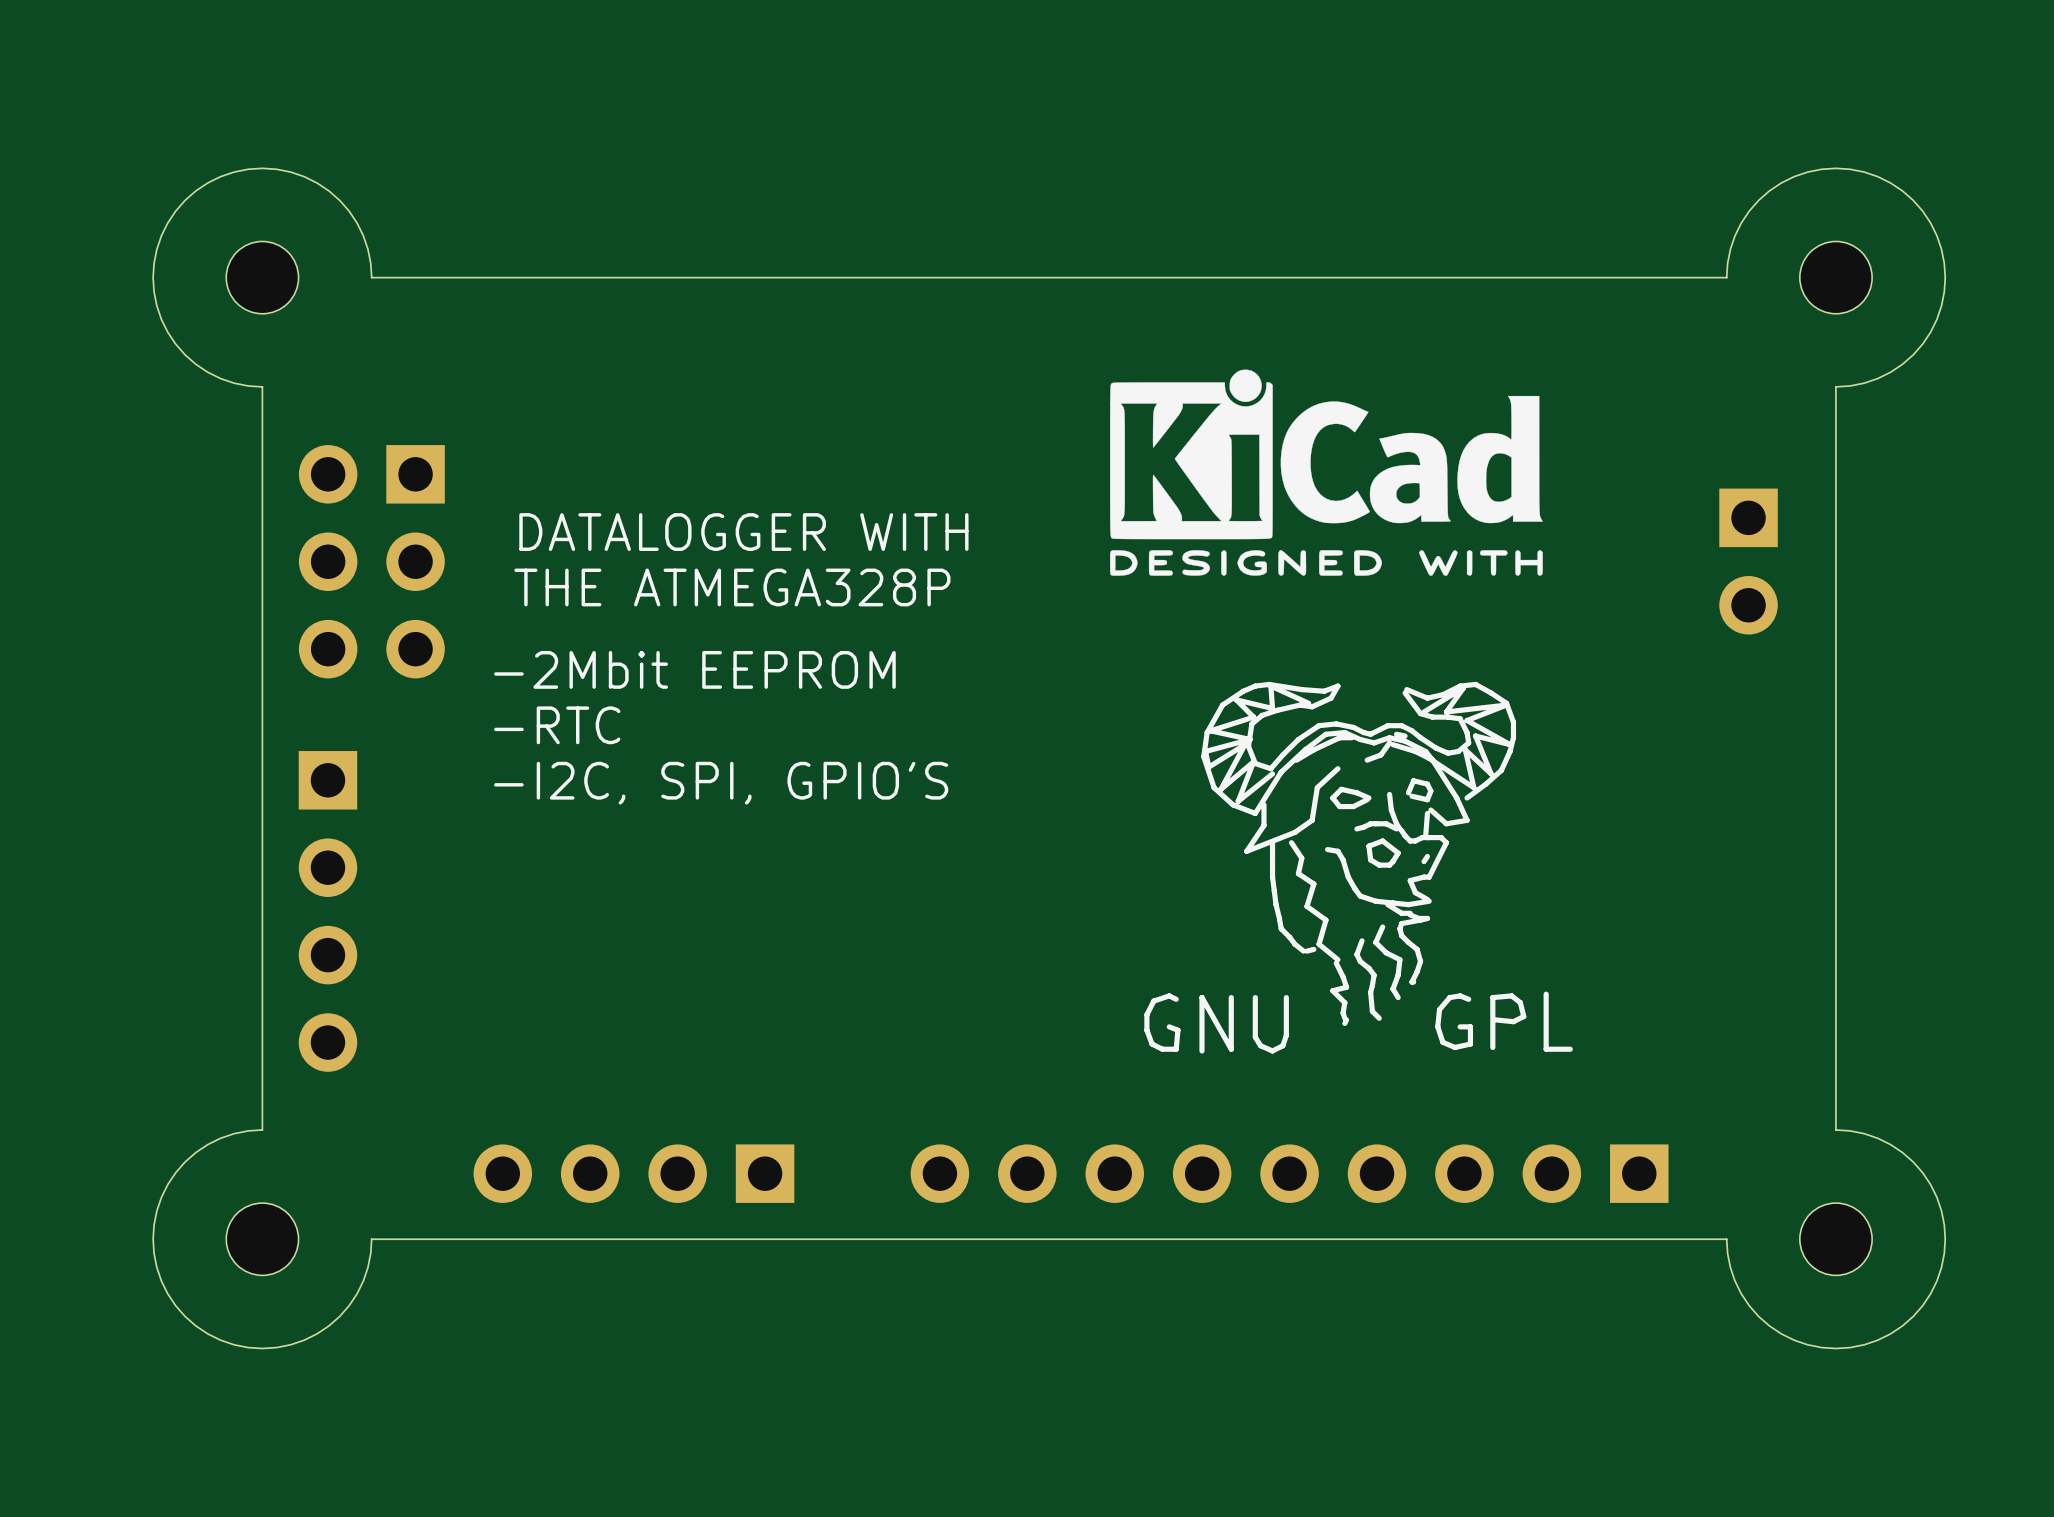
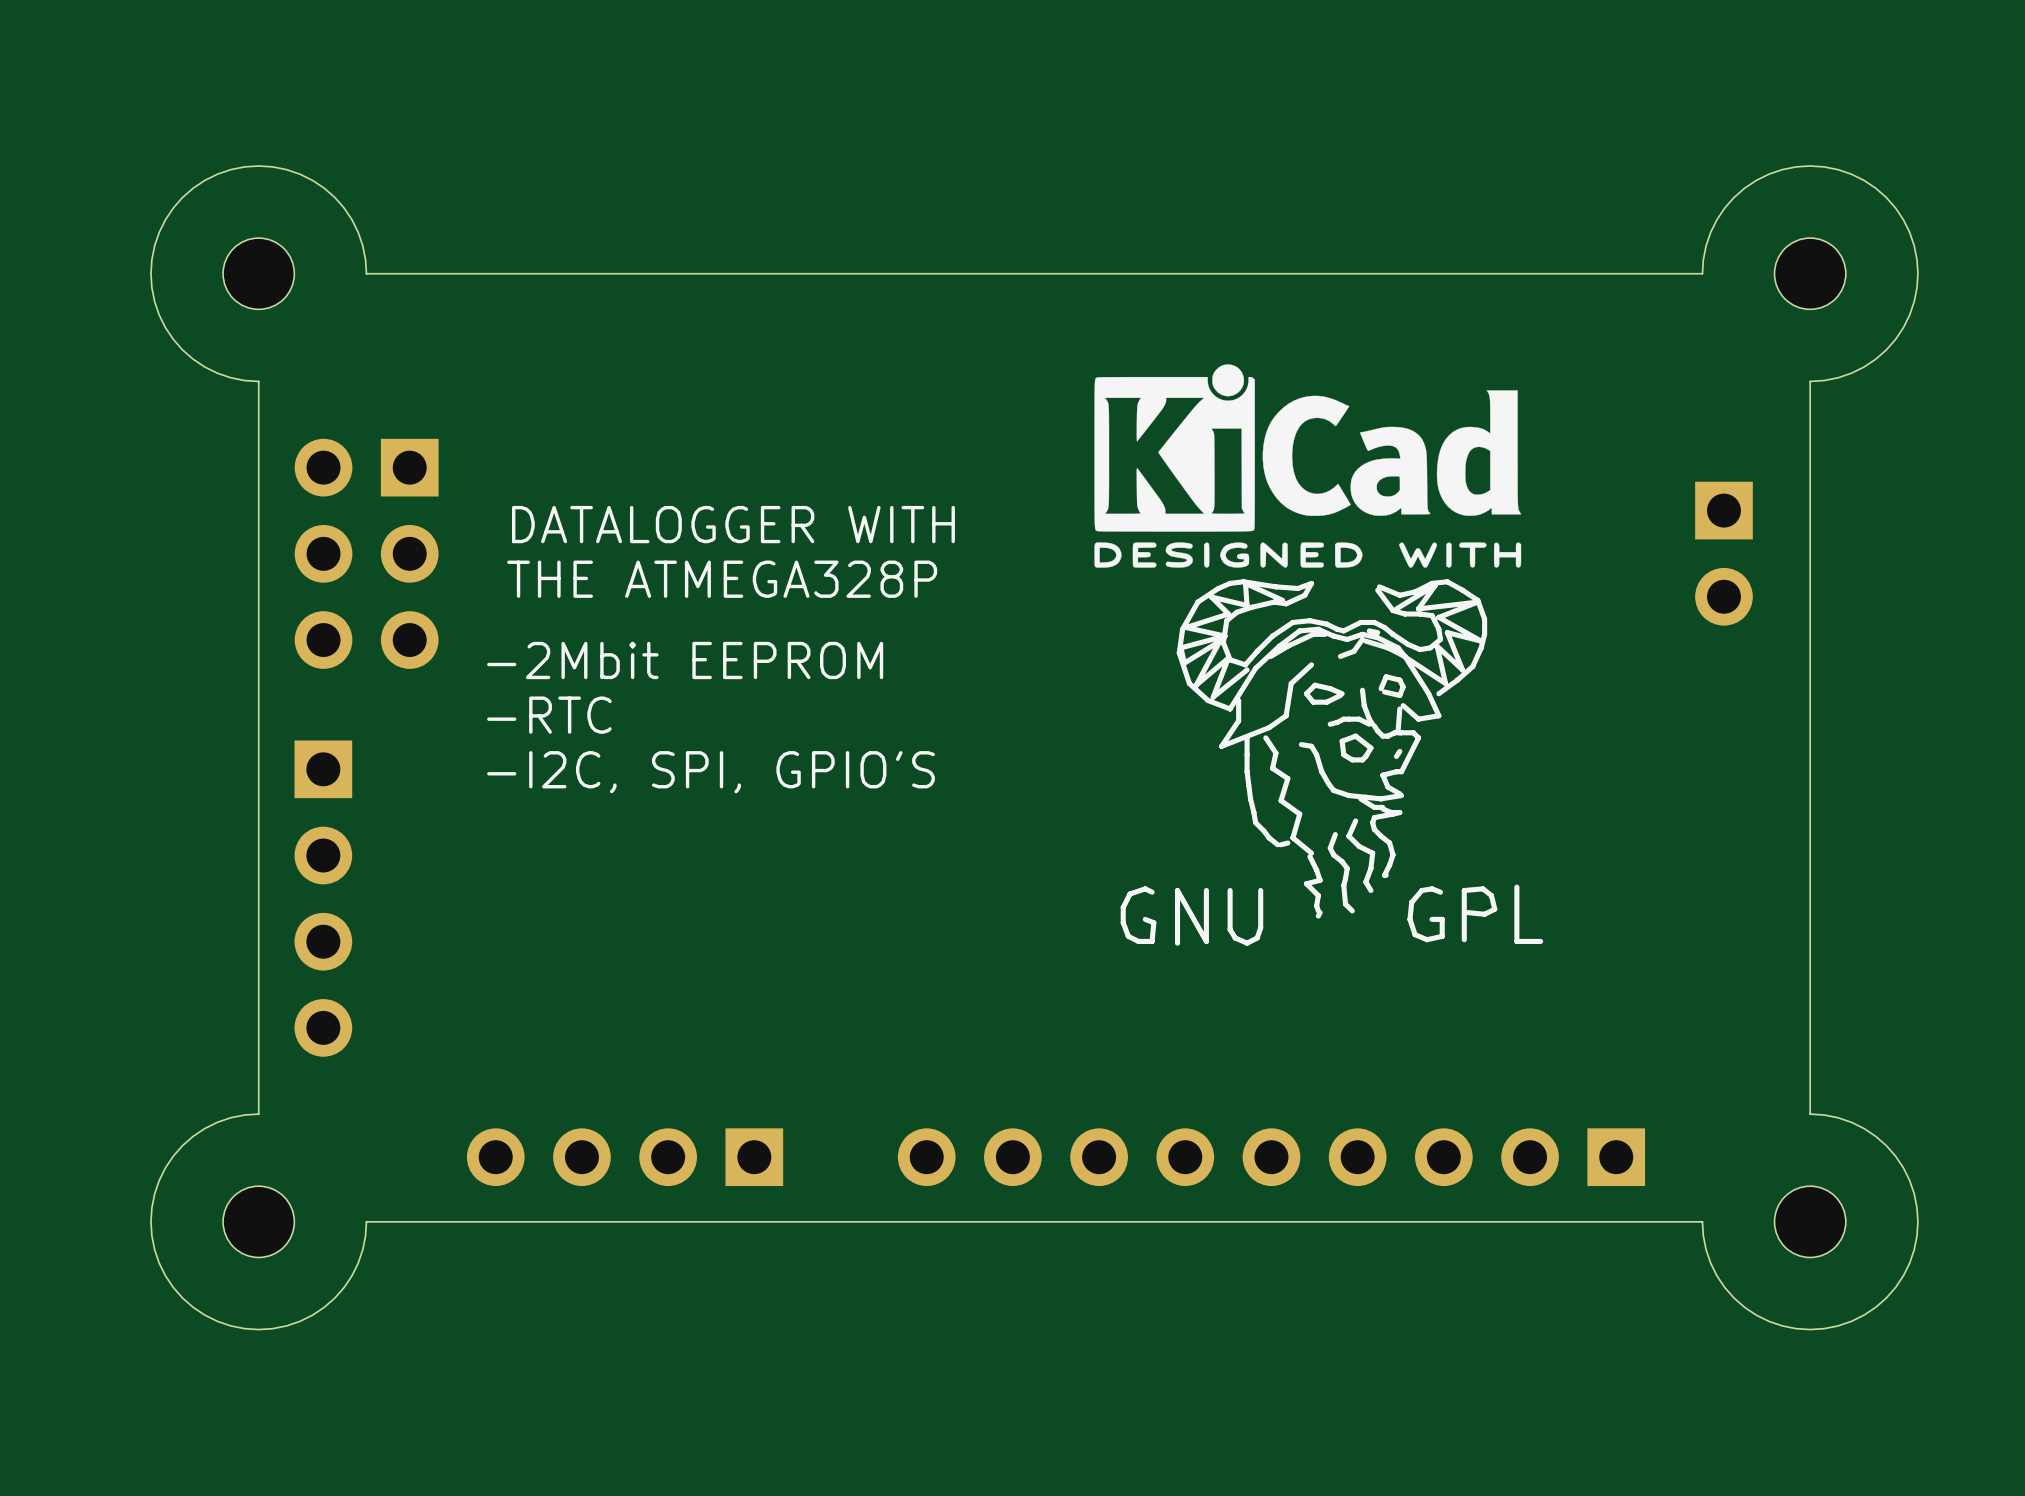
drawing position: (1358, 867) -> (1331, 762)

